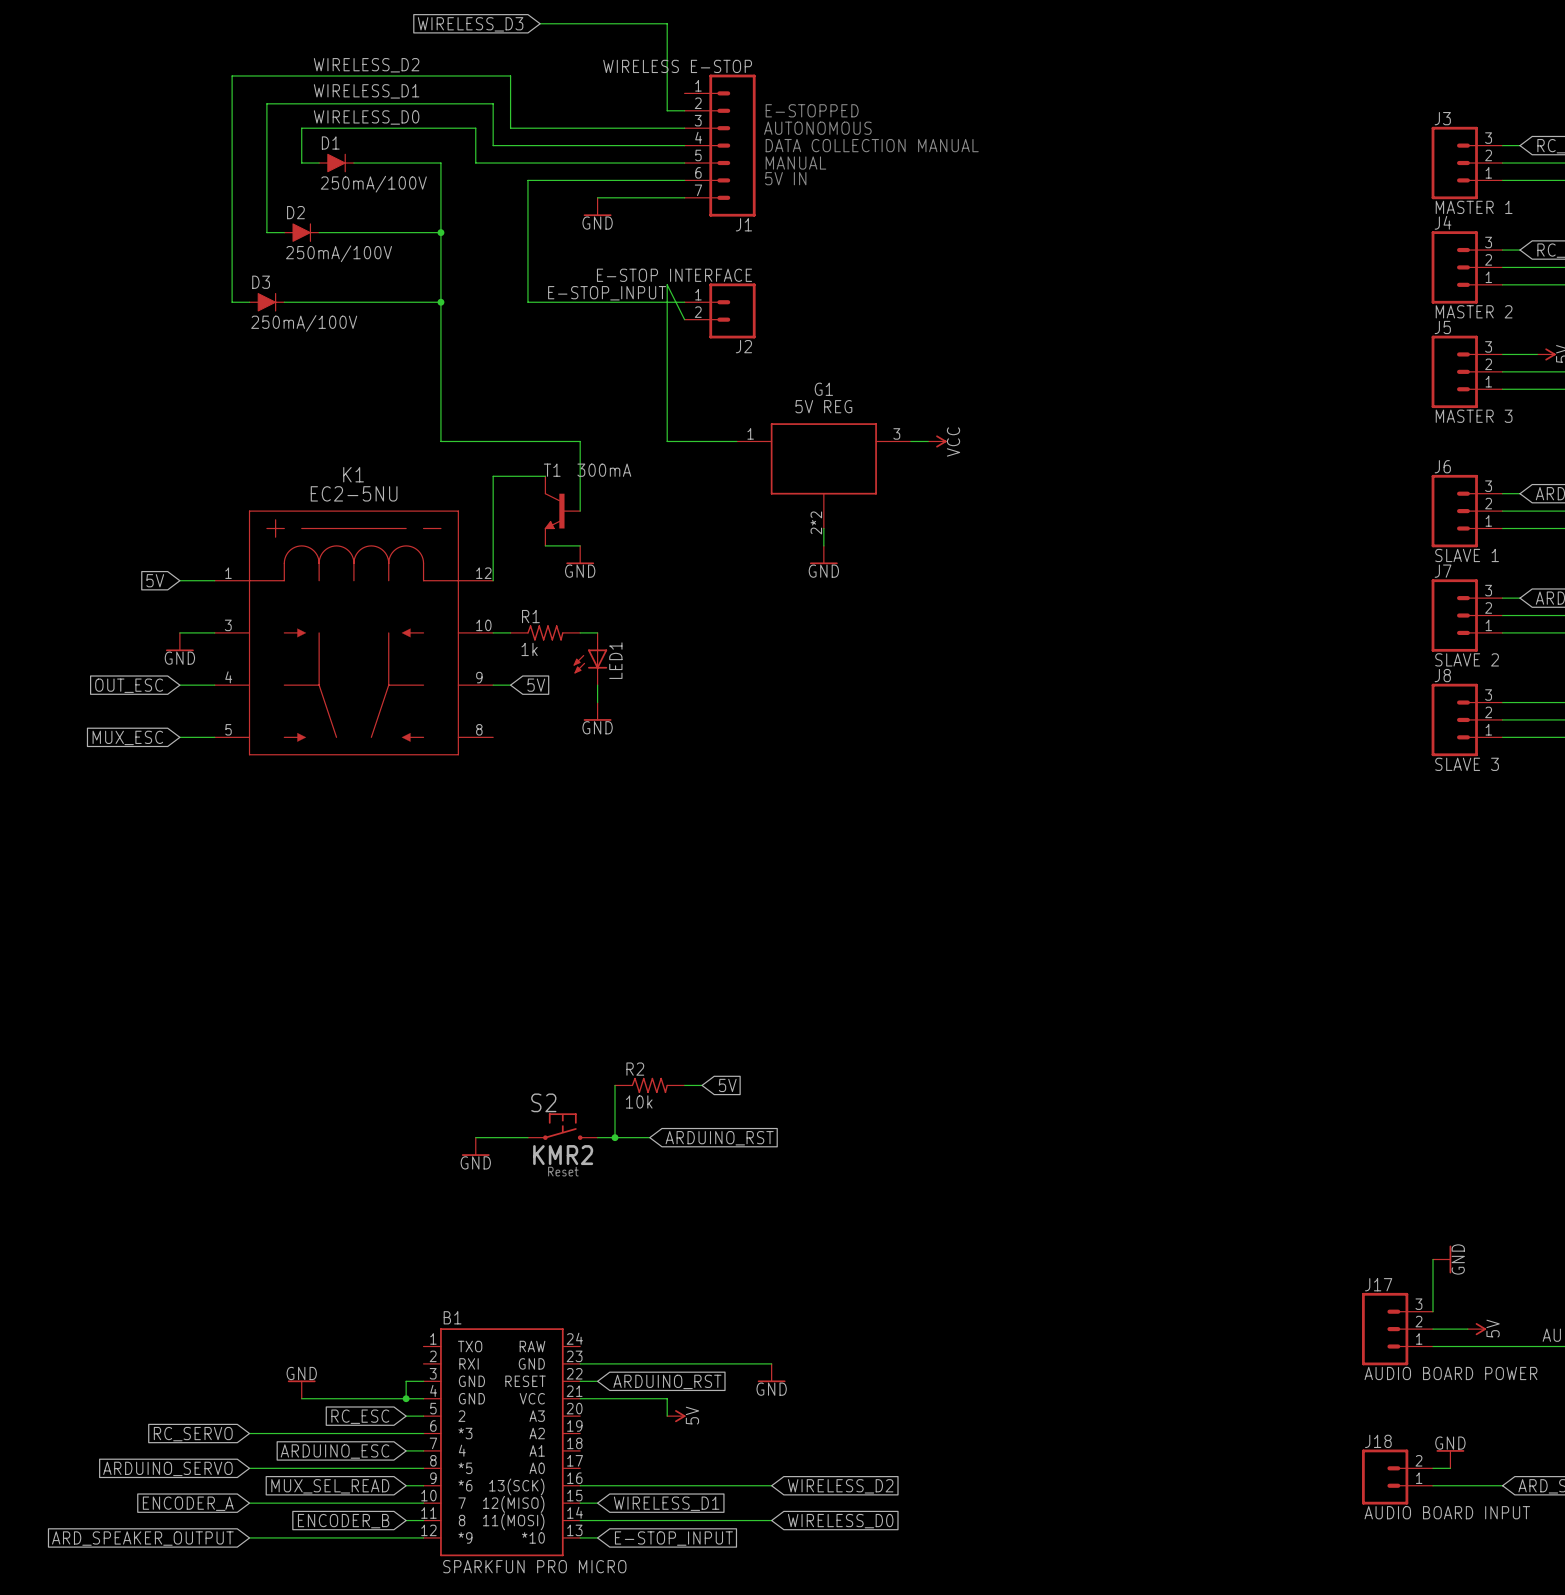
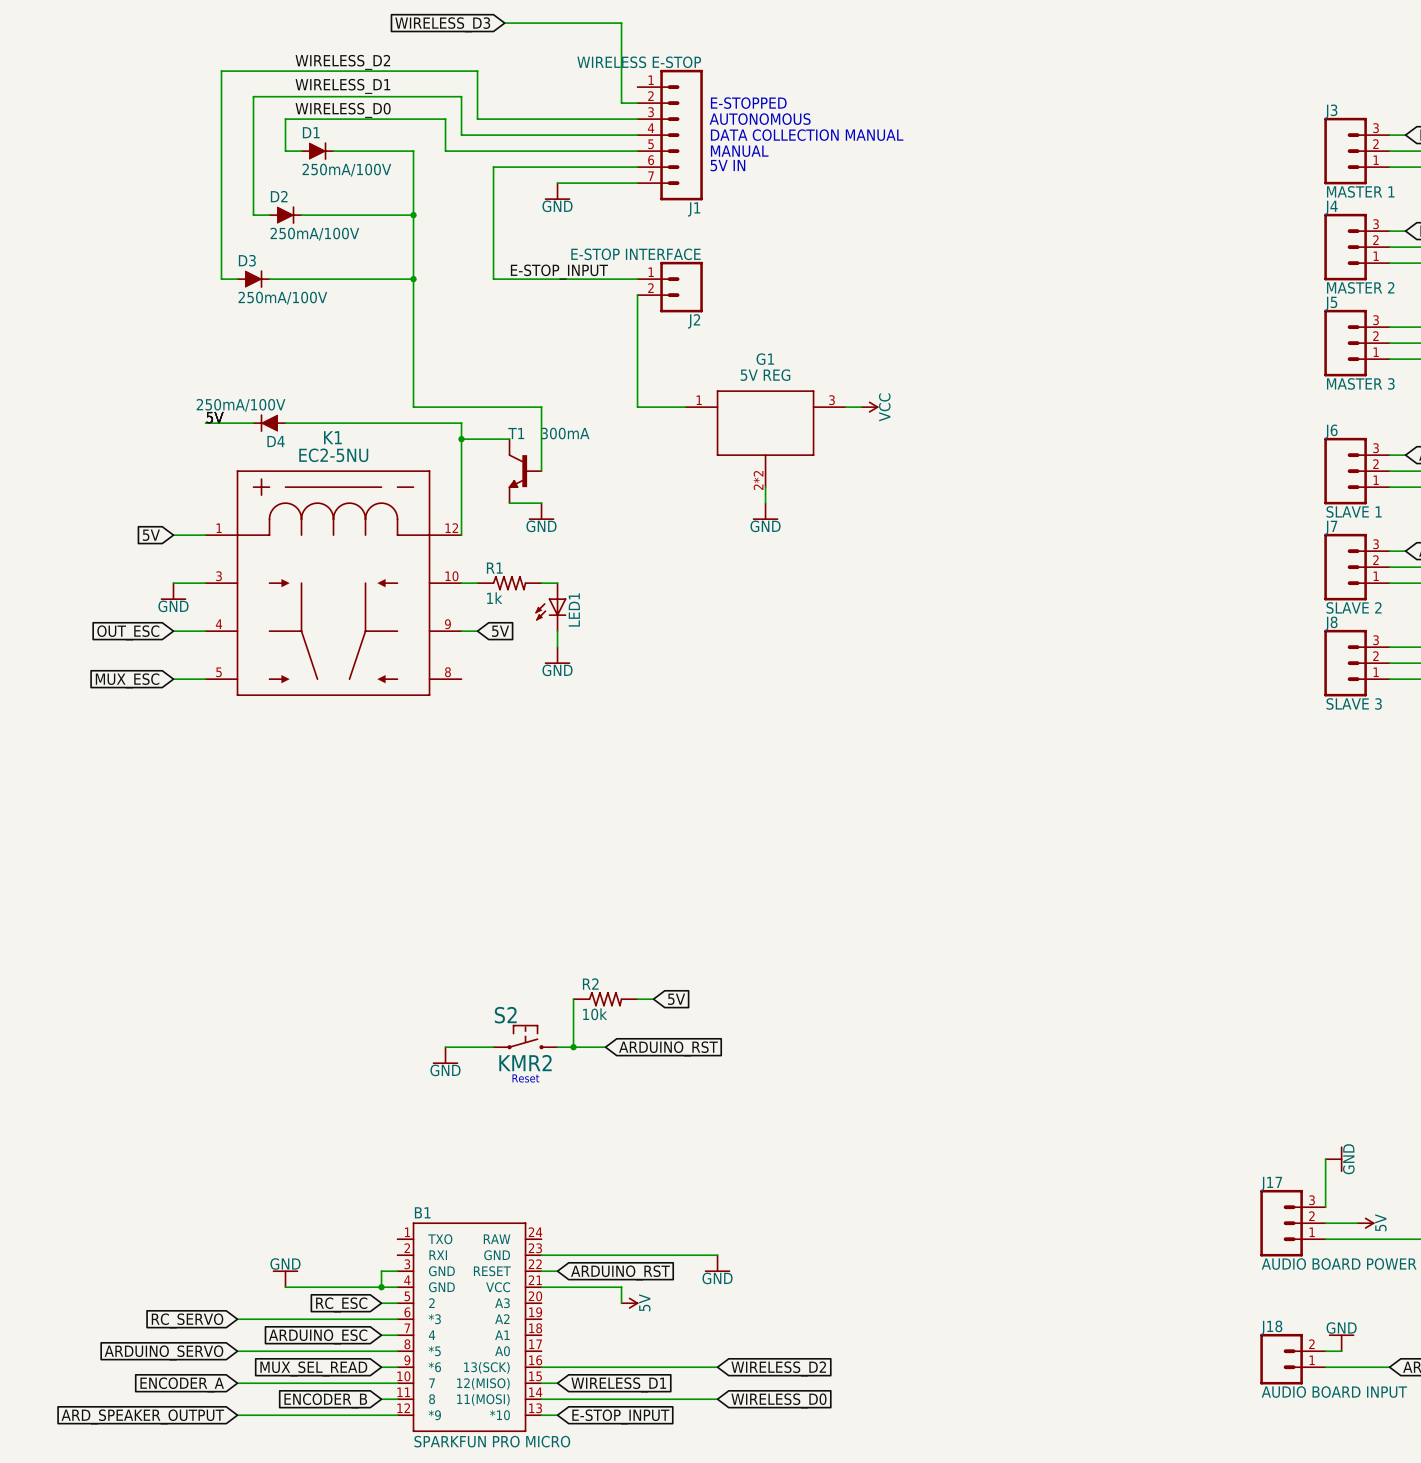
wire: (684, 319) (667, 284) (667, 441) (684, 441) -> (637, 295) (637, 407)
label: none -> 5V (215, 417)
wire: none -> (205, 423) (253, 423)
D4: none -> 250mA/100V (269, 423)
wire: none -> (285, 423) (461, 423) (461, 439)
junction: none -> (461, 439)

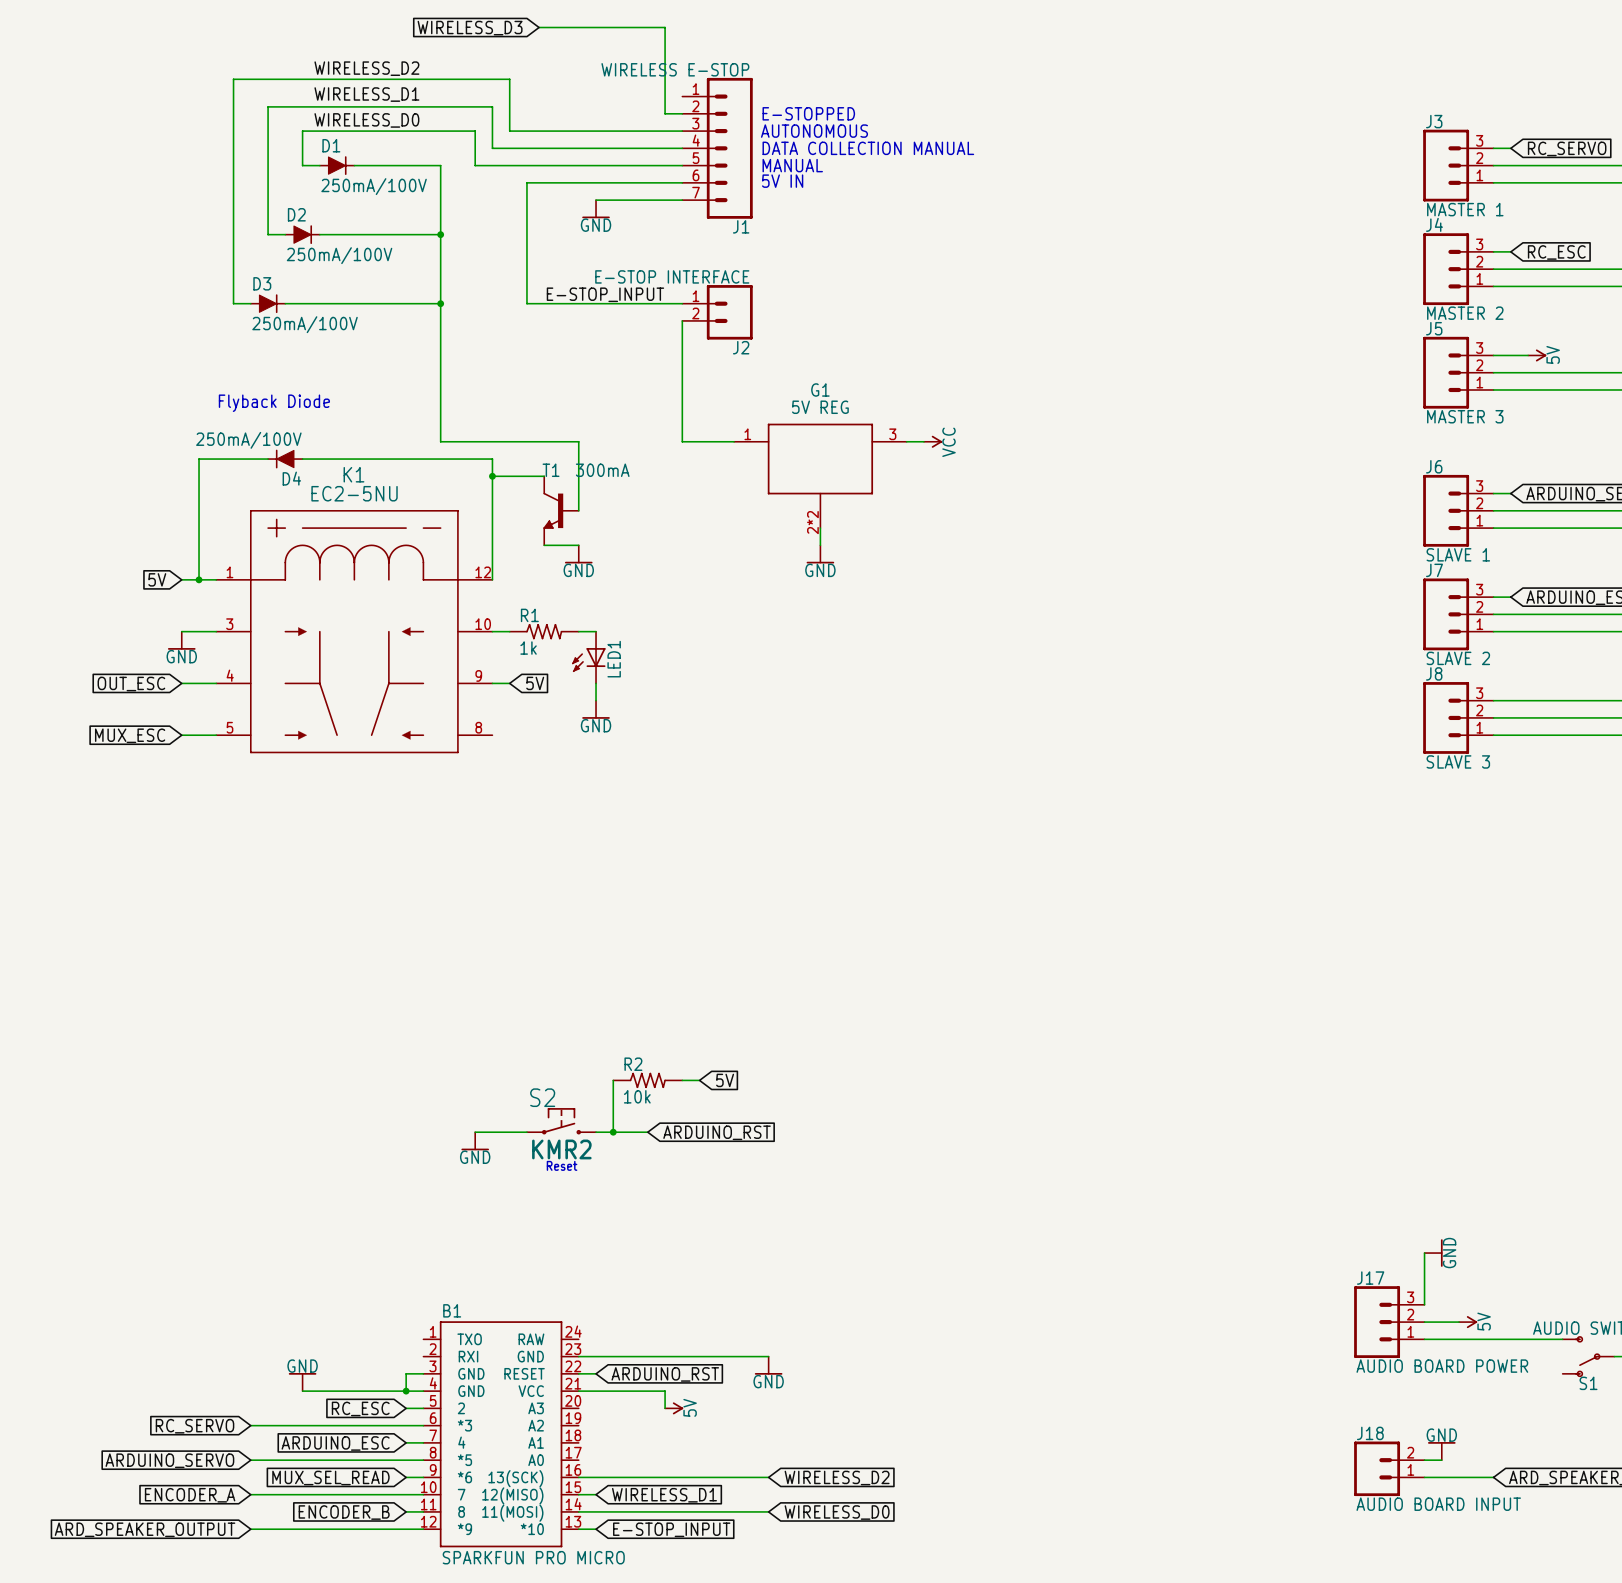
text: none -> Flyback Diode (274, 403)
label: 5V (215, 417) -> none
wire: none -> (216, 459) (199, 459) (199, 579)
junction: none -> (199, 579)

